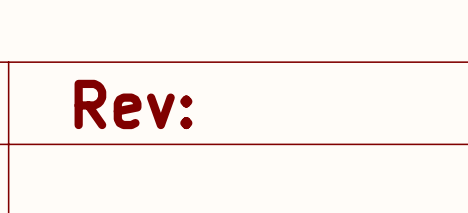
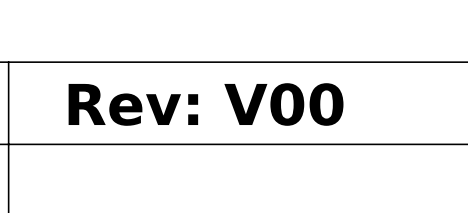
title block: Rev: (133, 104) -> Rev: V00 (206, 104)

